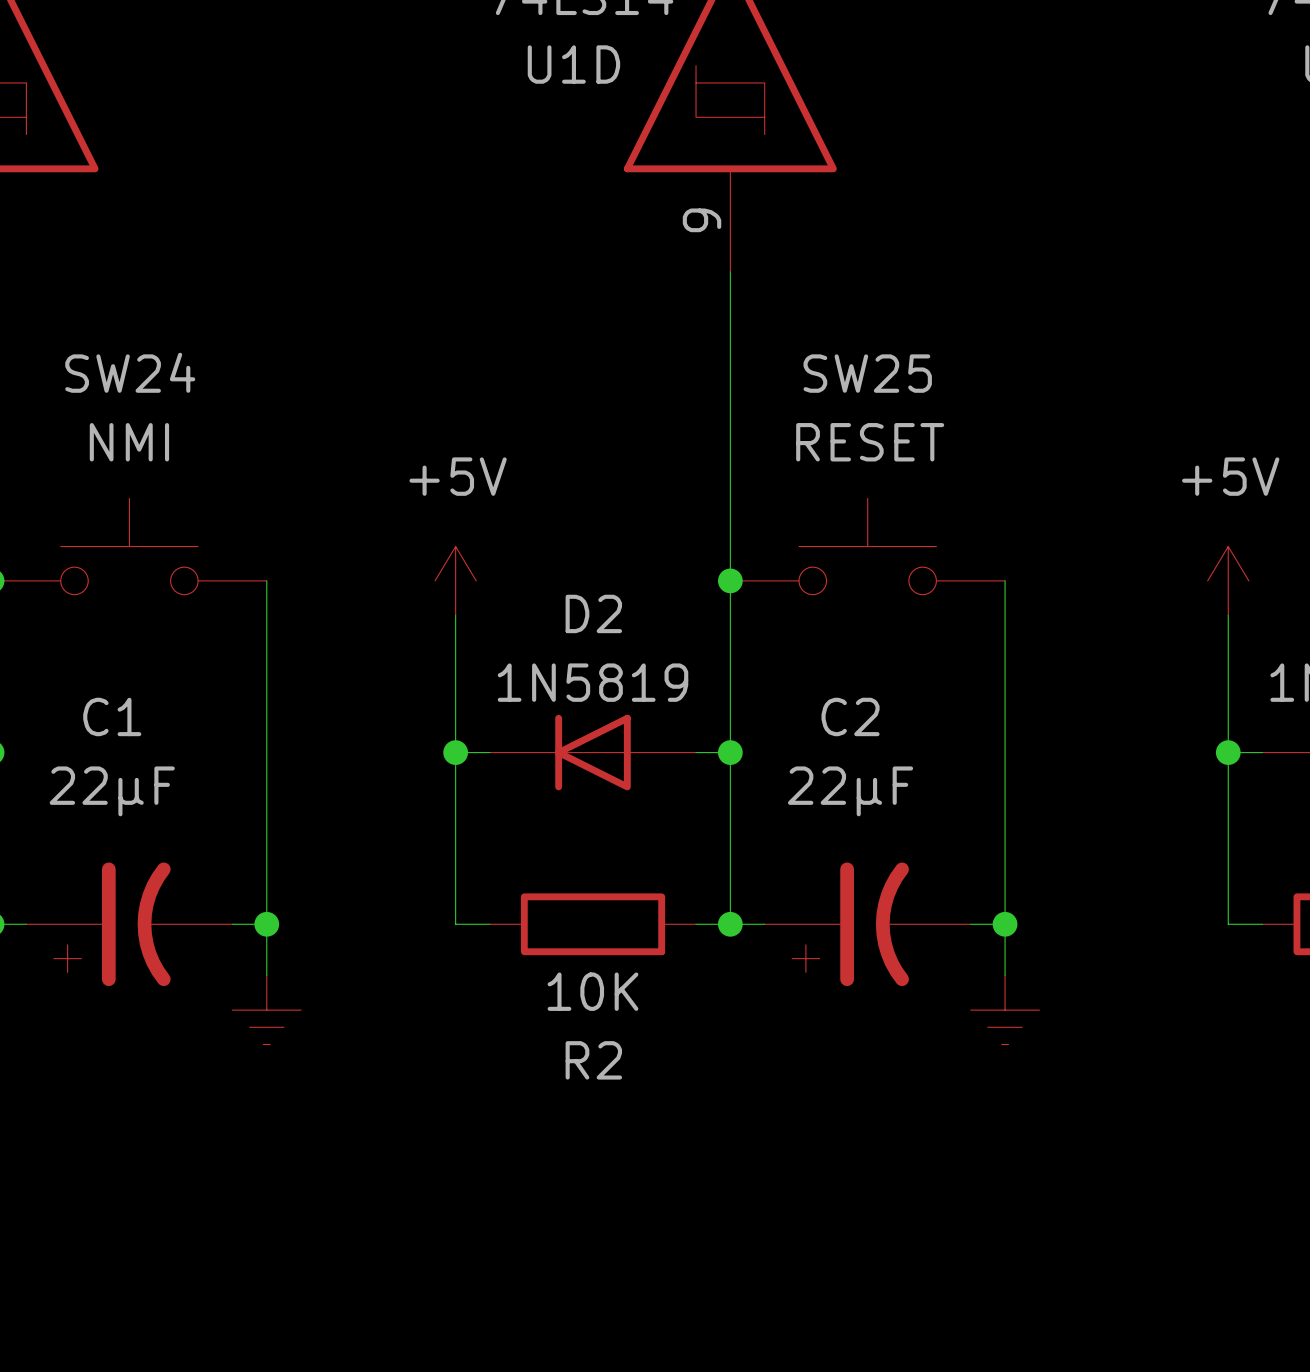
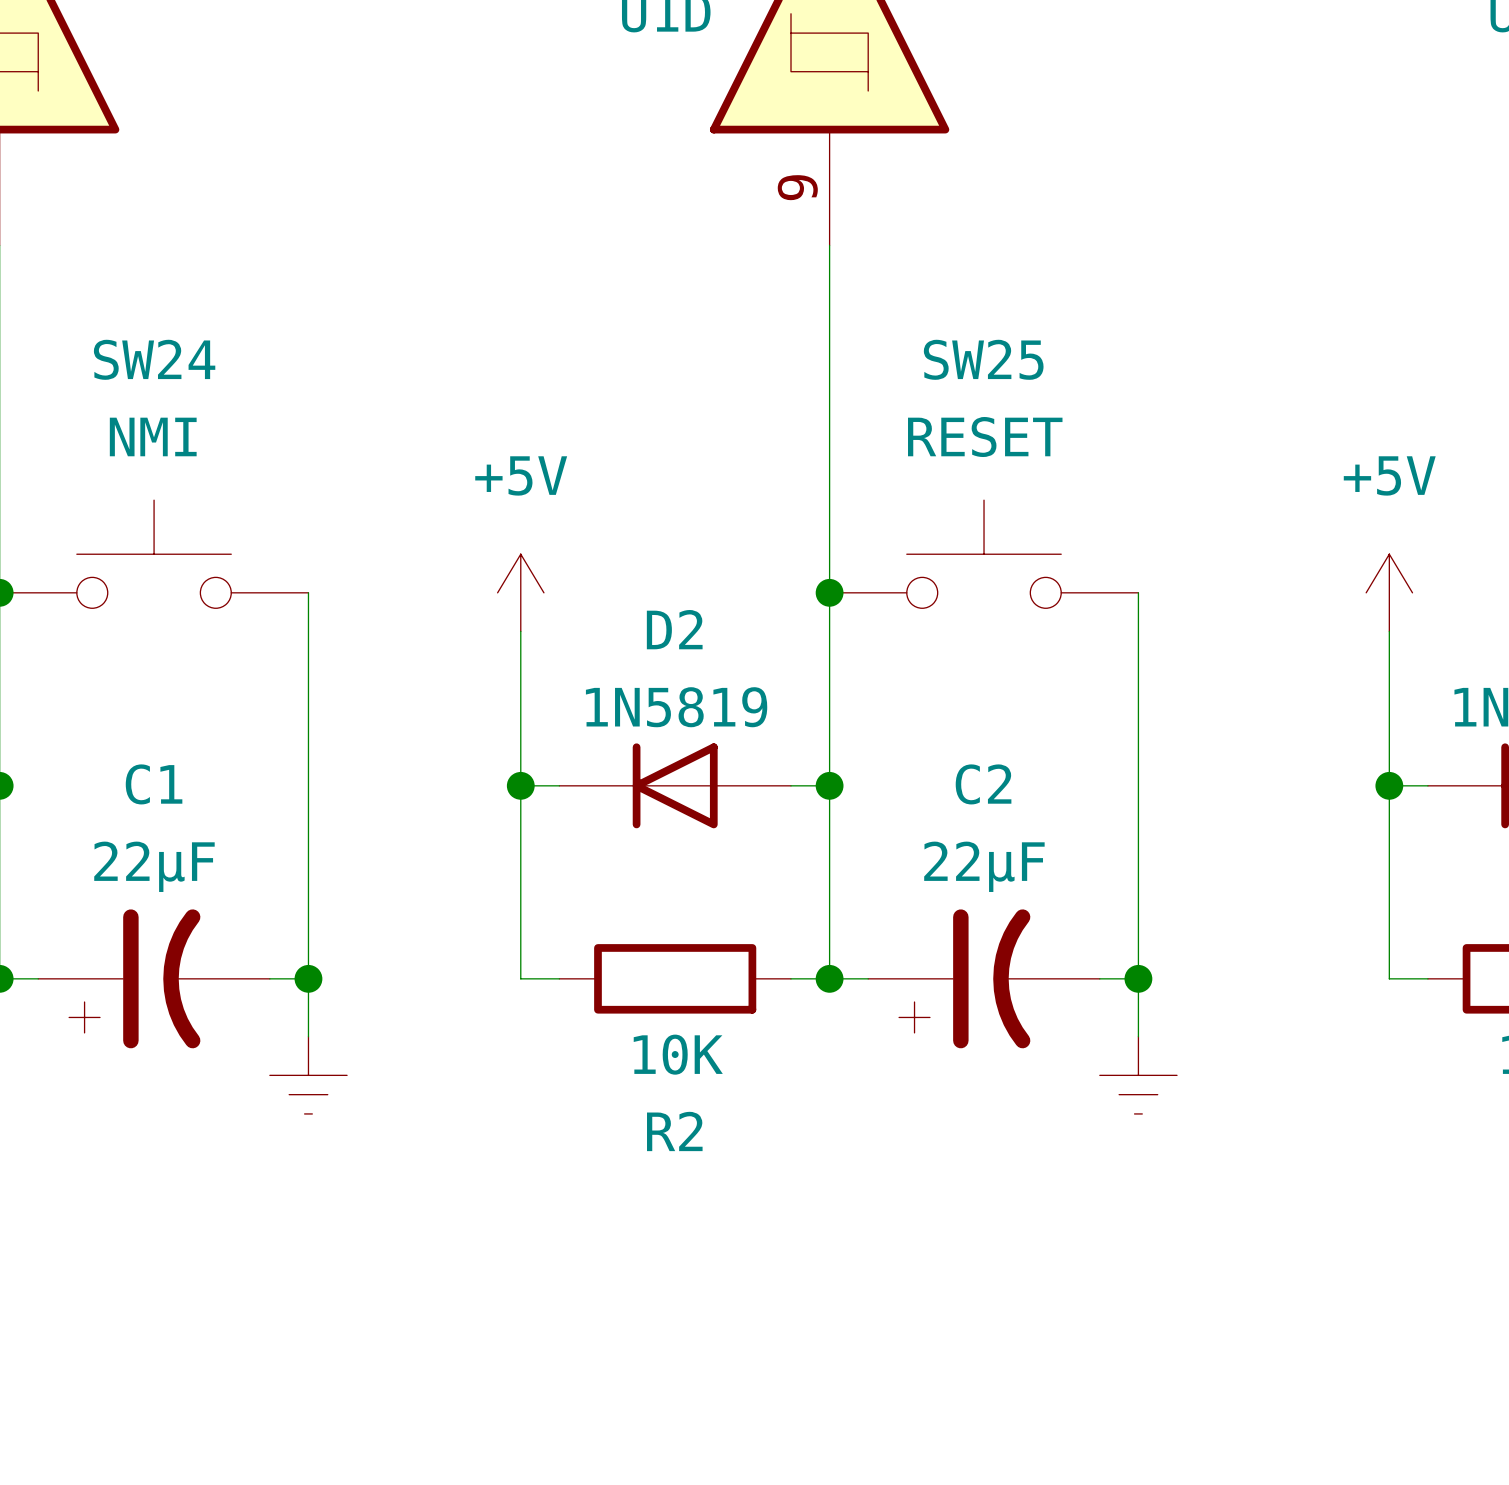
C1 name position: C1 (112, 716) -> C1 (154, 784)
C2 name position: C2 (850, 716) -> C2 (983, 784)
C1 value position: 22µF (112, 791) -> 22µF (154, 866)
C2 value position: 22µF (850, 791) -> 22µF (984, 866)

